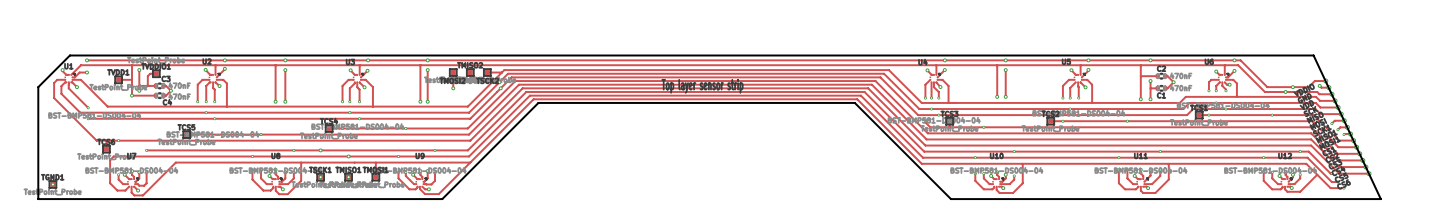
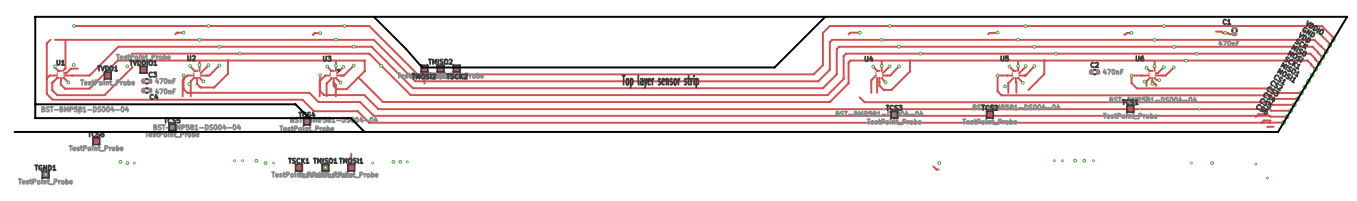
board edge: none -> (373, 16) (422, 67) (774, 67) (825, 16)
track: none -> (73, 26) (369, 26) (417, 74) (813, 74) (822, 65) (822, 32) (829, 26) (889, 26)
via: none -> (73, 26)
via: none -> (208, 26)
via: none -> (344, 26)
track: none -> (889, 26) (1321, 26) (1333, 39)
via: none -> (889, 26)
via: none -> (1025, 26)
via: none -> (1164, 26)
track: none -> (1216, 31) (1234, 34)
track: none -> (183, 32) (175, 34)
via: none -> (183, 32)
track: none -> (859, 32) (850, 32) (848, 34)
via: none -> (859, 32)
track: none -> (989, 33) (988, 34)
track: none -> (997, 32) (989, 32)
via: none -> (997, 32)
track: none -> (1131, 32) (1124, 34)
via: none -> (1131, 32)
via: none -> (1225, 32)
via: none -> (1317, 32)
track: none -> (1319, 32) (1329, 45)
track: none -> (320, 33) (312, 34)
via: none -> (320, 33)
track: none -> (50, 39) (46, 43) (46, 78)
track: none -> (55, 39) (373, 39) (415, 81) (818, 81) (829, 69) (829, 42) (832, 39) (1314, 39) (1326, 51)
via: none -> (199, 39)
via: none -> (335, 39)
via: none -> (881, 39)
via: none -> (1018, 39)
via: none -> (1154, 39)
track: none -> (219, 46) (371, 46) (412, 88) (822, 88) (836, 74) (836, 49) (839, 46) (1312, 46) (1322, 57)
via: none -> (219, 46)
via: none -> (353, 46)
via: none -> (899, 46)
via: none -> (1034, 46)
via: none -> (1173, 46)
board edge: (69, 55) (38, 87) (38, 199) (442, 199) (538, 102) (854, 102) (950, 199) (1380, 199) (1313, 55) (69, 55) -> none
track: none -> (131, 53) (369, 53) (410, 95) (827, 95) (843, 78) (843, 55) (845, 53) (920, 53)
via: none -> (239, 53)
track: none -> (920, 53) (1310, 53) (1319, 63)
via: none -> (920, 53)
via: none -> (1055, 53)
via: none -> (1196, 53)
track: (86, 60) (1240, 60) (1267, 87) (1308, 87) (1314, 81) (1325, 81) -> none
via: (86, 60) -> none
via: (224, 60) -> none
via: (285, 60) -> none
via: (368, 60) -> none
via: (427, 60) -> none
via: (944, 60) -> none
via: (1005, 60) -> none
via: (1088, 60) -> none
via: (1150, 60) -> none
via: (1234, 60) -> none
track: none -> (1044, 60) (1044, 74) (1028, 89)
via: none -> (1186, 60)
track: (132, 65) (132, 95) (155, 95) -> none
track: (275, 65) (275, 101) -> none
track: (420, 65) (420, 101) -> none
track: (997, 65) (997, 96) -> none
track: (1140, 65) (1140, 99) -> none
via: none -> (73, 64)
via: none -> (199, 65)
via: none -> (219, 65)
via: none -> (335, 65)
via: none -> (353, 65)
via: none -> (381, 65)
via: none -> (881, 65)
via: none -> (1018, 66)
via: none -> (1034, 66)
via: none -> (1154, 66)
track: (139, 70) (139, 90) -> none
track: (285, 70) (285, 101) -> none
via: (285, 70) -> none
track: (427, 70) (427, 101) -> none
via: (427, 70) -> none
via: none -> (899, 66)
track: (1005, 70) (1005, 96) -> none
via: (1005, 70) -> none
via: none -> (1173, 67)
track: (73, 72) (80, 65) (1238, 65) (1264, 91) (1317, 91) (1319, 94) (1331, 94) -> (65, 68) (65, 39)
via: (86, 72) -> none
track: (487, 72) (501, 72) -> none
line: (73, 73) (74, 73) (74, 74) (73, 73) -> none
track: (156, 73) (150, 73) (147, 76) (147, 85) -> none
line: (218, 73) (219, 73) (219, 74) (218, 73) -> none
line: (938, 73) (940, 73) (940, 74) (938, 73) -> none
line: (1083, 73) (1084, 73) (1084, 74) (1083, 73) -> none
line: (1227, 73) (1228, 73) (1228, 74) (1227, 73) -> none
track: none -> (1315, 69) (1307, 60) (850, 60) (848, 62) (848, 83) (829, 102) (383, 102) (358, 77)
track: (1140, 76) (1157, 76) -> none
track: (1165, 76) (1173, 82) (1165, 88) -> none
track: (80, 79) (107, 106) (467, 106) (504, 70) (888, 70) (921, 102) (1179, 102) (1185, 96) (1316, 96) (1320, 100) (1335, 100) -> (72, 75) (89, 75) (118, 46) (219, 46)
track: (118, 79) (132, 79) -> none
track: none -> (183, 75) (183, 89) (187, 92) (309, 92) (318, 102) (360, 102) (373, 115) (1287, 116)
via: none -> (183, 75)
track: (223, 79) (226, 83) (226, 106) -> (206, 75) (209, 75) (219, 65)
track: none -> (320, 75) (320, 91) (324, 95) (364, 95) (378, 109) (1269, 109) (1290, 110)
via: none -> (320, 75)
track: (365, 79) (372, 87) (372, 106) -> (341, 75) (353, 65)
track: (942, 79) (948, 85) (948, 102) -> (887, 75) (890, 75) (899, 66)
track: none -> (997, 75) (997, 91) (1001, 95) (1269, 95) (1273, 98) (1297, 98)
via: none -> (997, 75)
track: (1069, 79) (1062, 85) (1062, 98) -> (1007, 75) (997, 75)
track: (1087, 79) (1092, 84) (1092, 102) -> (1024, 75) (1034, 66)
via: none -> (1131, 75)
track: (1211, 79) (1208, 82) (1208, 90) -> (1141, 75) (1131, 75) (1131, 83) (1136, 88) (1269, 88) (1274, 92) (1301, 92)
track: (1233, 79) (1236, 83) (1236, 96) -> (1162, 75) (1165, 75) (1173, 67)
track: (1150, 81) (1150, 99) -> none
via: (1150, 81) -> none
track: (213, 82) (214, 101) -> (197, 77) (197, 83) (200, 87) (214, 87) (227, 73) (228, 60)
via: (499, 82) -> none
via: (1173, 82) -> none
track: (68, 84) (68, 88) (88, 107) -> (60, 80) (60, 84) (64, 88) (89, 88) (117, 60) (364, 60) (364, 71) (346, 89) (336, 89) (333, 82)
track: (139, 85) (155, 85) -> none
track: (163, 85) (170, 90) (163, 95) -> none
track: (1319, 85) (1328, 87) -> none
via: (1319, 85) -> none
part: none -> (1308, 81)
track: (61, 86) (61, 93) (80, 112) (469, 112) (508, 73) (884, 73) (913, 102) -> (53, 81) (52, 90) (57, 95) (104, 95) (131, 67)
via: none -> (1144, 81)
track: (933, 87) (938, 91) (938, 98) -> (879, 82) (879, 85) (883, 89) (891, 89) (909, 71) (909, 60)
via: (1292, 87) -> none
via: none -> (189, 84)
via: (453, 88) -> none
via: (500, 88) -> none
track: (1150, 88) (1157, 88) -> none
part rotation: 0° (1161, 88) -> 90° clockwise (1234, 30)
part position: (1161, 88) -> (1234, 30)
via: none -> (1152, 83)
via: (139, 90) -> none
via: (170, 90) -> none
via: (1208, 90) -> none
via: (1216, 90) -> none
via: (1225, 90) -> none
via: none -> (1005, 86)
via: (1285, 91) -> none
via: (132, 95) -> none
via: (997, 96) -> none
via: (1005, 96) -> none
track: (54, 98) (96, 140) (470, 140) (522, 88) (868, 88) (925, 145) (1311, 145) (1339, 173) (1369, 173) -> (46, 92) (52, 99) (302, 99) (313, 111) (357, 111) (369, 122) (1283, 122)
via: (925, 98) -> none
via: (931, 98) -> none
via: (938, 98) -> none
via: (1062, 98) -> none
via: (1070, 98) -> none
via: (1078, 98) -> none
via: (1140, 99) -> none
via: (1150, 99) -> none
via: (197, 101) -> none
via: (206, 101) -> none
via: (214, 101) -> none
via: (275, 101) -> none
via: (285, 101) -> none
via: (342, 101) -> none
via: (349, 101) -> none
via: (359, 101) -> none
via: (420, 101) -> none
via: (427, 101) -> none
via: (88, 107) -> none
track: (1338, 107) (1320, 107) (1315, 102) (1189, 102) (1183, 109) (918, 108) -> (1294, 104) (1272, 104) (1269, 102) (864, 102)
via: (931, 109) -> none
via: (1070, 109) -> none
via: (1225, 109) -> none
board edge: none -> (35, 104) (295, 104) (309, 118)
via: (206, 112) -> none
via: (349, 112) -> none
track: (1341, 114) (1320, 114) (1315, 109) (1193, 109) (1187, 115) (918, 115) (880, 77) (511, 77) (470, 118) (88, 118) -> none
track: (1199, 115) (1313, 115) (1339, 140) (1353, 140) -> none
via: (214, 118) -> none
via: (359, 118) -> none
track: (925, 119) (930, 127) (1311, 127) (1337, 153) (1359, 153) -> none
track: (1050, 121) (1312, 121) (1338, 147) (1356, 147) -> none
via: (1062, 121) -> none
via: (1127, 121) -> none
via: (1331, 123) -> none
via: (983, 127) -> none
part: (1347, 127) -> none
track: (329, 128) (467, 128) (515, 81) (875, 81) (927, 133) (1311, 133) (1338, 160) (1362, 160) -> none
via: (405, 128) -> none
via: (1337, 129) -> none
track: (186, 134) (469, 134) (518, 84) (871, 84) (926, 139) (1311, 139) (1338, 167) (1365, 167) -> none
via: (260, 134) -> none
via: (1344, 134) -> none
board edge: none -> (14, 131) (1278, 131) (1347, 16) (35, 16) (35, 118) (350, 118) (364, 131)
via: (118, 140) -> none
track: (146, 150) (467, 150) (526, 91) (864, 91) (924, 151) (1308, 151) (1331, 173) -> none
via: (146, 150) -> none
via: (293, 150) -> none
via: (320, 150) -> none
via: (435, 150) -> none
via: (1014, 151) -> none
via: (1160, 151) -> none
via: (1300, 151) -> none
via: (252, 156) -> none
via: (348, 156) -> none
via: (398, 156) -> none
via: (975, 157) -> none
via: (1118, 157) -> none
via: (1263, 157) -> none
track: (301, 162) (301, 180) (287, 194) (279, 194) (275, 190) (275, 186) -> none
track: (470, 162) (175, 162) (142, 195) (134, 195) (131, 192) (131, 186) -> none
track: (1022, 163) (1022, 183) (1013, 192) (999, 192) (996, 186) -> none
track: (1168, 163) (1168, 179) (1155, 192) (1143, 192) (1140, 186) -> none
track: (252, 169) (252, 179) (263, 190) (270, 190) (273, 186) -> none
track: (260, 169) (260, 178) (266, 184) (272, 184) -> none
track: (275, 169) (278, 179) -> none
track: (1118, 169) (1118, 183) (1124, 189) (1135, 189) (1138, 186) -> none
track: (1127, 169) (1127, 178) (1133, 184) (1137, 184) -> none
track: (1140, 169) (1143, 179) -> none
track: (1150, 169) (1150, 175) (1144, 181) -> none
track: (1160, 169) (1160, 175) (1152, 184) (1144, 184) -> none
track: (132, 171) (134, 179) -> none
track: (420, 171) (422, 179) -> none
track: (427, 171) (427, 178) (423, 181) -> none
track: (435, 171) (435, 180) (431, 184) (423, 184) -> none
track: (139, 172) (139, 178) (135, 181) -> none
track: (146, 172) (146, 183) (144, 185) (135, 184) -> none
track: (285, 172) (285, 178) (279, 181) -> none
track: (293, 172) (293, 178) (288, 184) (279, 184) -> none
track: (398, 172) (398, 178) (409, 189) (415, 189) (417, 186) -> none
track: (405, 172) (405, 175) (416, 184) -> none
via: (405, 172) -> none
track: (997, 172) (999, 179) -> none
track: (1263, 172) (1263, 180) (1272, 189) (1280, 189) (1282, 186) -> none
track: (1272, 172) (1272, 178) (1277, 184) (1281, 184) -> none
via: (1272, 172) -> none
track: (1285, 172) (1287, 179) -> none
track: (975, 173) (975, 180) (983, 189) (992, 189) (994, 186) -> none
via: (975, 173) -> none
track: (983, 173) (983, 178) (989, 184) (993, 184) -> none
via: (983, 173) -> none
track: (118, 174) (118, 179) (123, 184) (127, 184) -> none
via: (118, 174) -> none
track: (124, 174) (131, 179) -> none
via: (124, 174) -> none
track: (413, 174) (419, 179) -> none
via: (413, 174) -> none
track: (1005, 174) (1005, 178) (1000, 181) -> none
via: (1005, 174) -> none
track: (1292, 174) (1288, 181) -> none
via: (1292, 174) -> none
track: (1300, 174) (1300, 178) (1294, 184) (1288, 184) -> none
via: (1300, 174) -> none
track: (1317, 174) (1300, 191) (1287, 191) (1285, 186) -> none
track: (269, 175) (275, 179) -> none
via: (269, 175) -> none
via: (991, 175) -> none
track: (1014, 175) (1014, 179) (1009, 184) (1000, 184) -> none
via: (1014, 175) -> none
track: (1134, 175) (1140, 179) -> none
via: (1134, 175) -> none
track: (1279, 175) (1285, 179) -> none
via: (1279, 175) -> none
via: (320, 177) -> none
line: (136, 178) (138, 178) (138, 179) (136, 178) -> none
line: (280, 178) (281, 178) (281, 179) (280, 178) -> none
line: (425, 178) (426, 178) (426, 179) (425, 178) -> none
line: (1002, 178) (1003, 178) (1003, 179) (1002, 178) -> none
line: (1146, 178) (1148, 178) (1148, 179) (1146, 178) -> none
line: (1290, 178) (1291, 178) (1291, 179) (1290, 178) -> none
part: (131, 182) -> none
part: (275, 182) -> none
part: (419, 182) -> none
part: (996, 182) -> none
part: (1140, 182) -> none
part: (1285, 182) -> none
track: (1337, 182) (1331, 182) (1307, 157) (922, 157) (860, 95) (529, 95) (469, 156) (113, 156) (110, 160) (110, 183) (117, 190) (125, 190) (129, 186) -> none
track: (134, 186) (138, 190) -> none
track: (278, 186) (282, 189) -> none
track: (419, 186) (425, 194) (438, 194) (533, 99) (857, 99) (921, 163) (1306, 163) (1330, 188) (1344, 188) -> none
track: (422, 186) (428, 189) -> none
track: (999, 186) (1003, 188) -> none
track: (1143, 186) (1148, 188) -> none
track: (1287, 186) (1291, 188) -> none
via: (1003, 188) -> none
via: (1148, 188) -> none
via: (1291, 188) -> none
via: (282, 189) -> none
via: (428, 189) -> none
via: (138, 190) -> none

